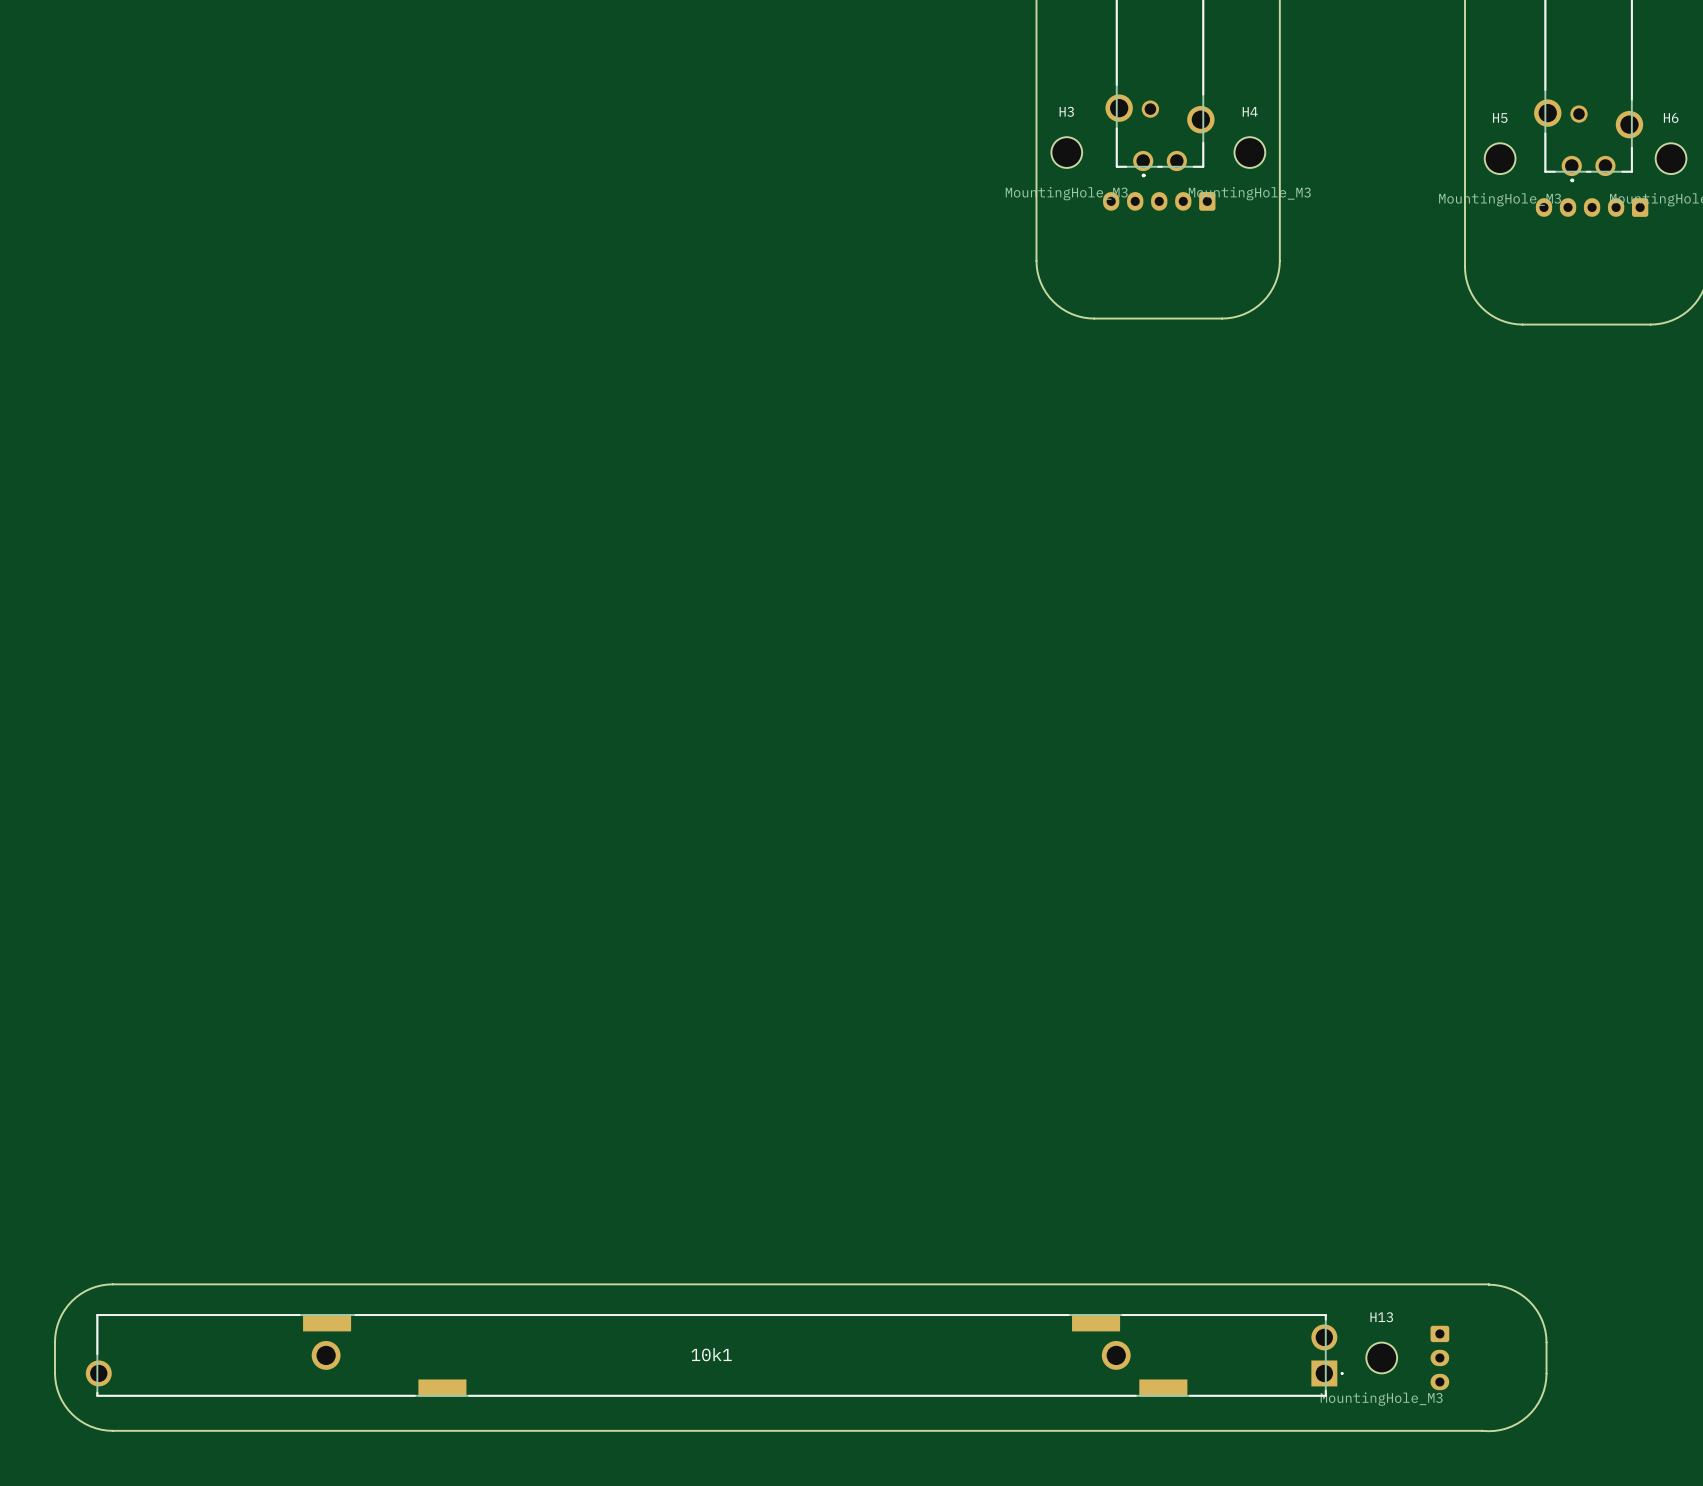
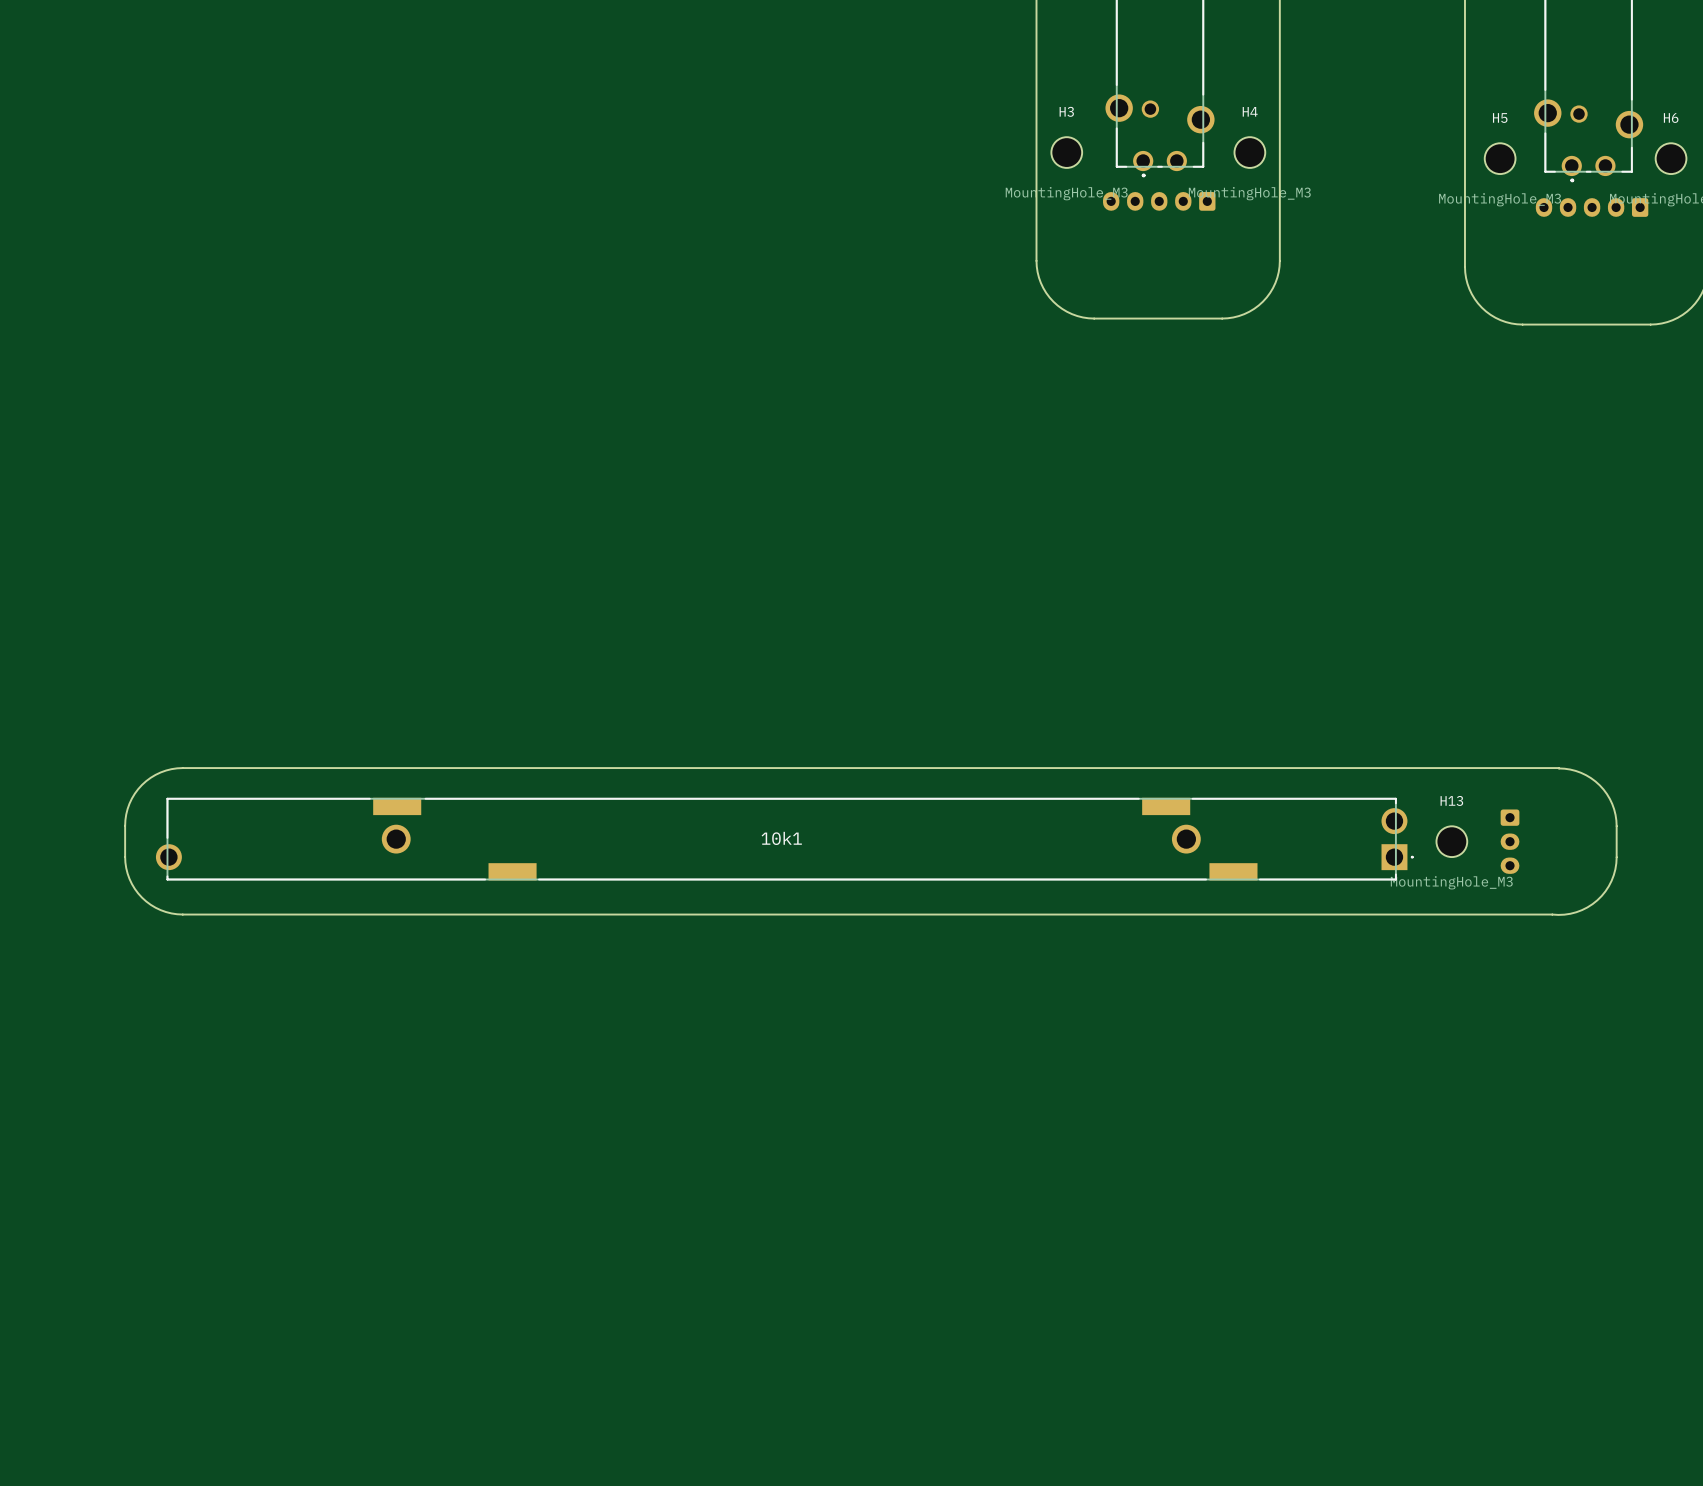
board edge: none -> (182, 768) (1558, 768) (1575, 770) (1586, 775) (1595, 781) (1606, 794) (1612, 804) (1616, 820) (1616, 863) (1608, 886) (1597, 900) (1576, 912) (1558, 914) (177, 914) (166, 912) (150, 904) (142, 897) (131, 884) (125, 862) (125, 825) (129, 803) (142, 784) (160, 772) (182, 768)
part: none -> (1510, 841)
board edge: (112, 1284) (1488, 1284) (1505, 1287) (1516, 1291) (1525, 1297) (1536, 1310) (1542, 1320) (1546, 1336) (1546, 1379) (1538, 1402) (1527, 1416) (1511, 1426) (1488, 1431) (107, 1430) (90, 1426) (80, 1421) (71, 1413) (61, 1400) (55, 1378) (55, 1342) (59, 1319) (71, 1301) (90, 1288) (112, 1284) -> none
10k1 position: (714, 1355) -> (784, 839)
H13 position: (1381, 1357) -> (1451, 841)
part: (1439, 1357) -> none

